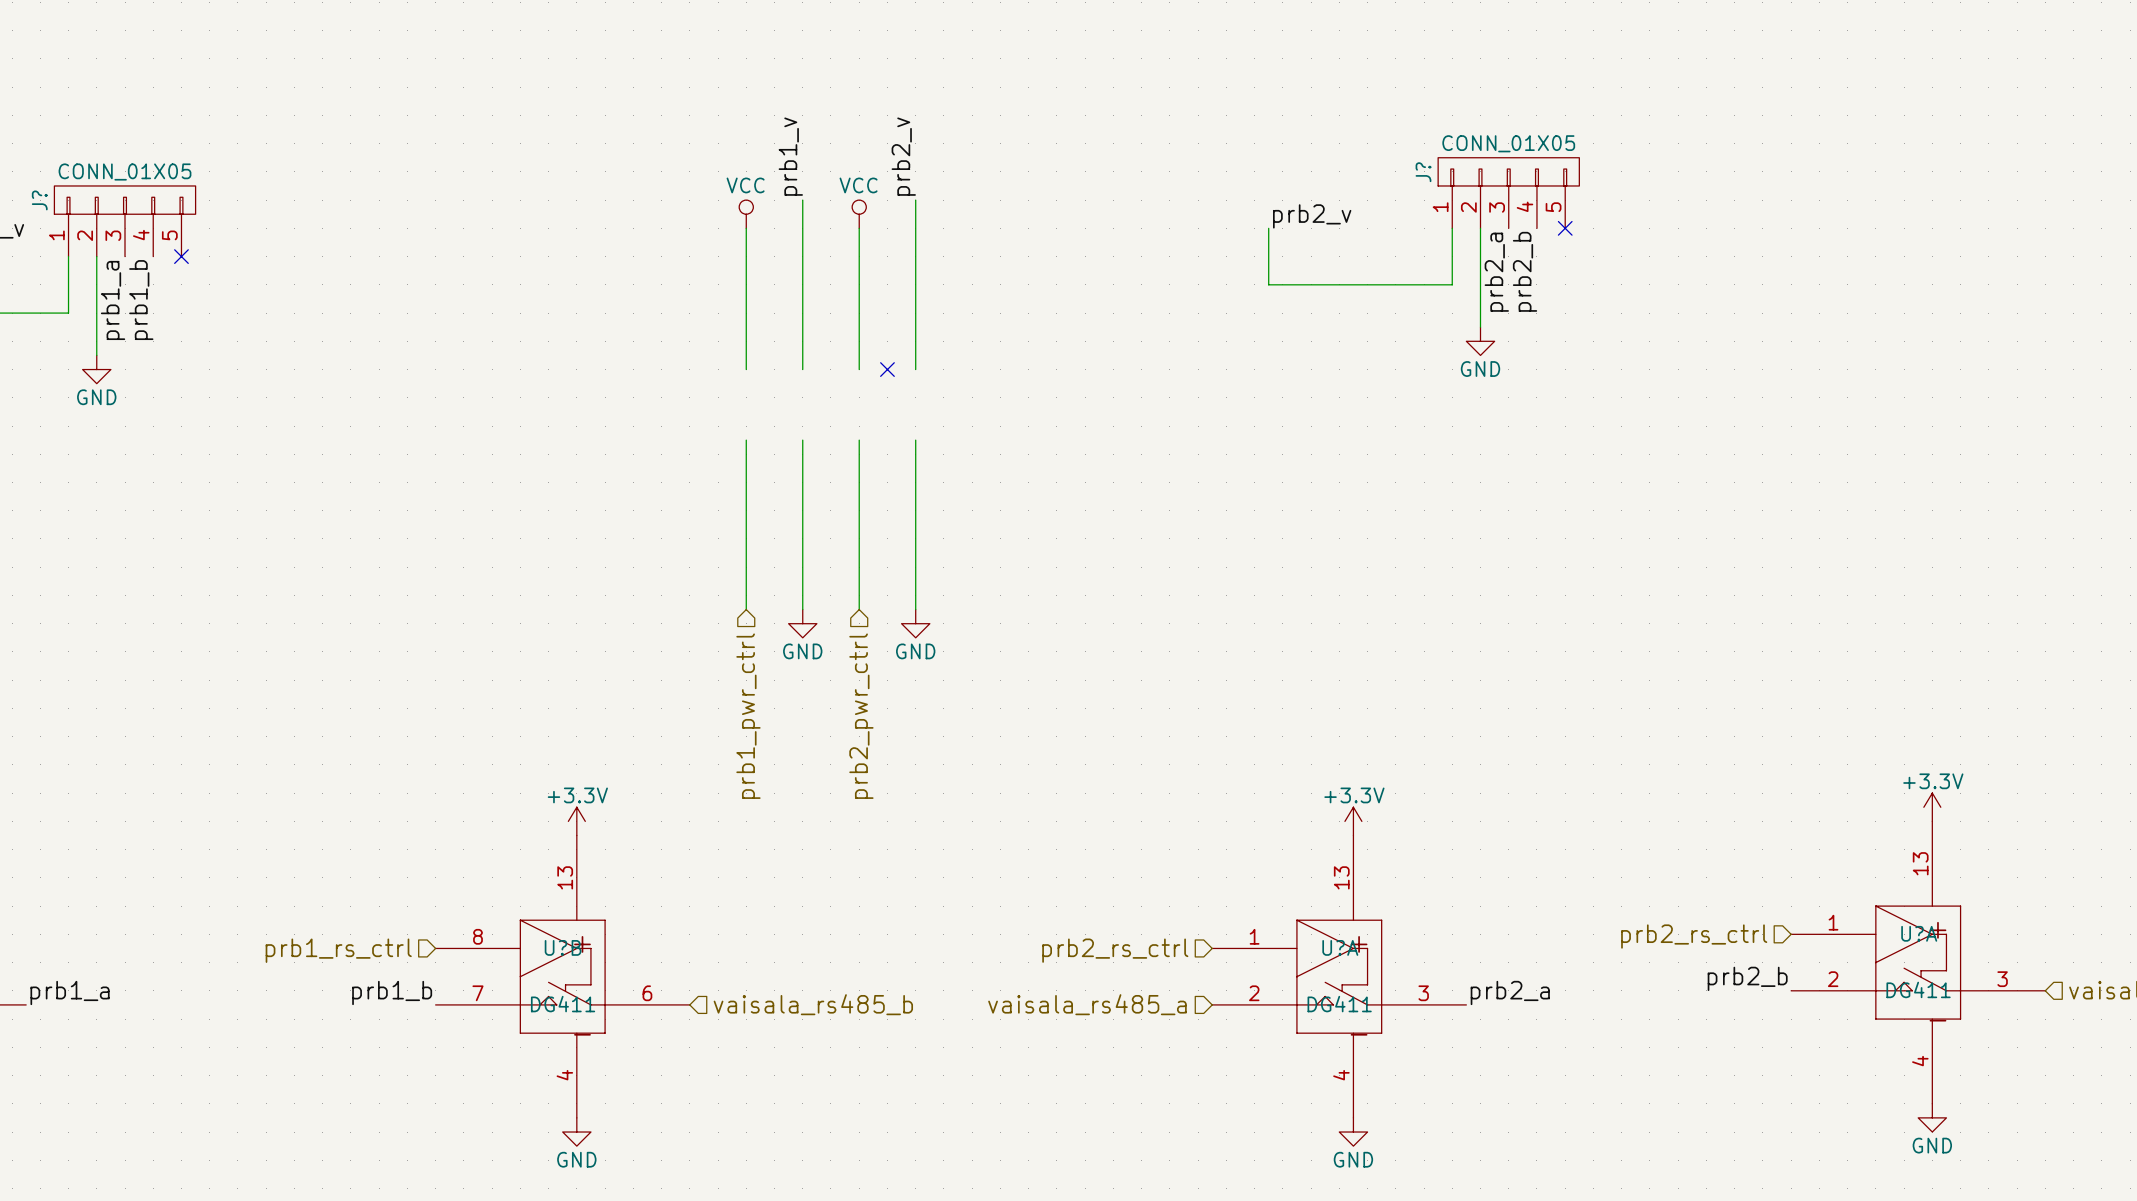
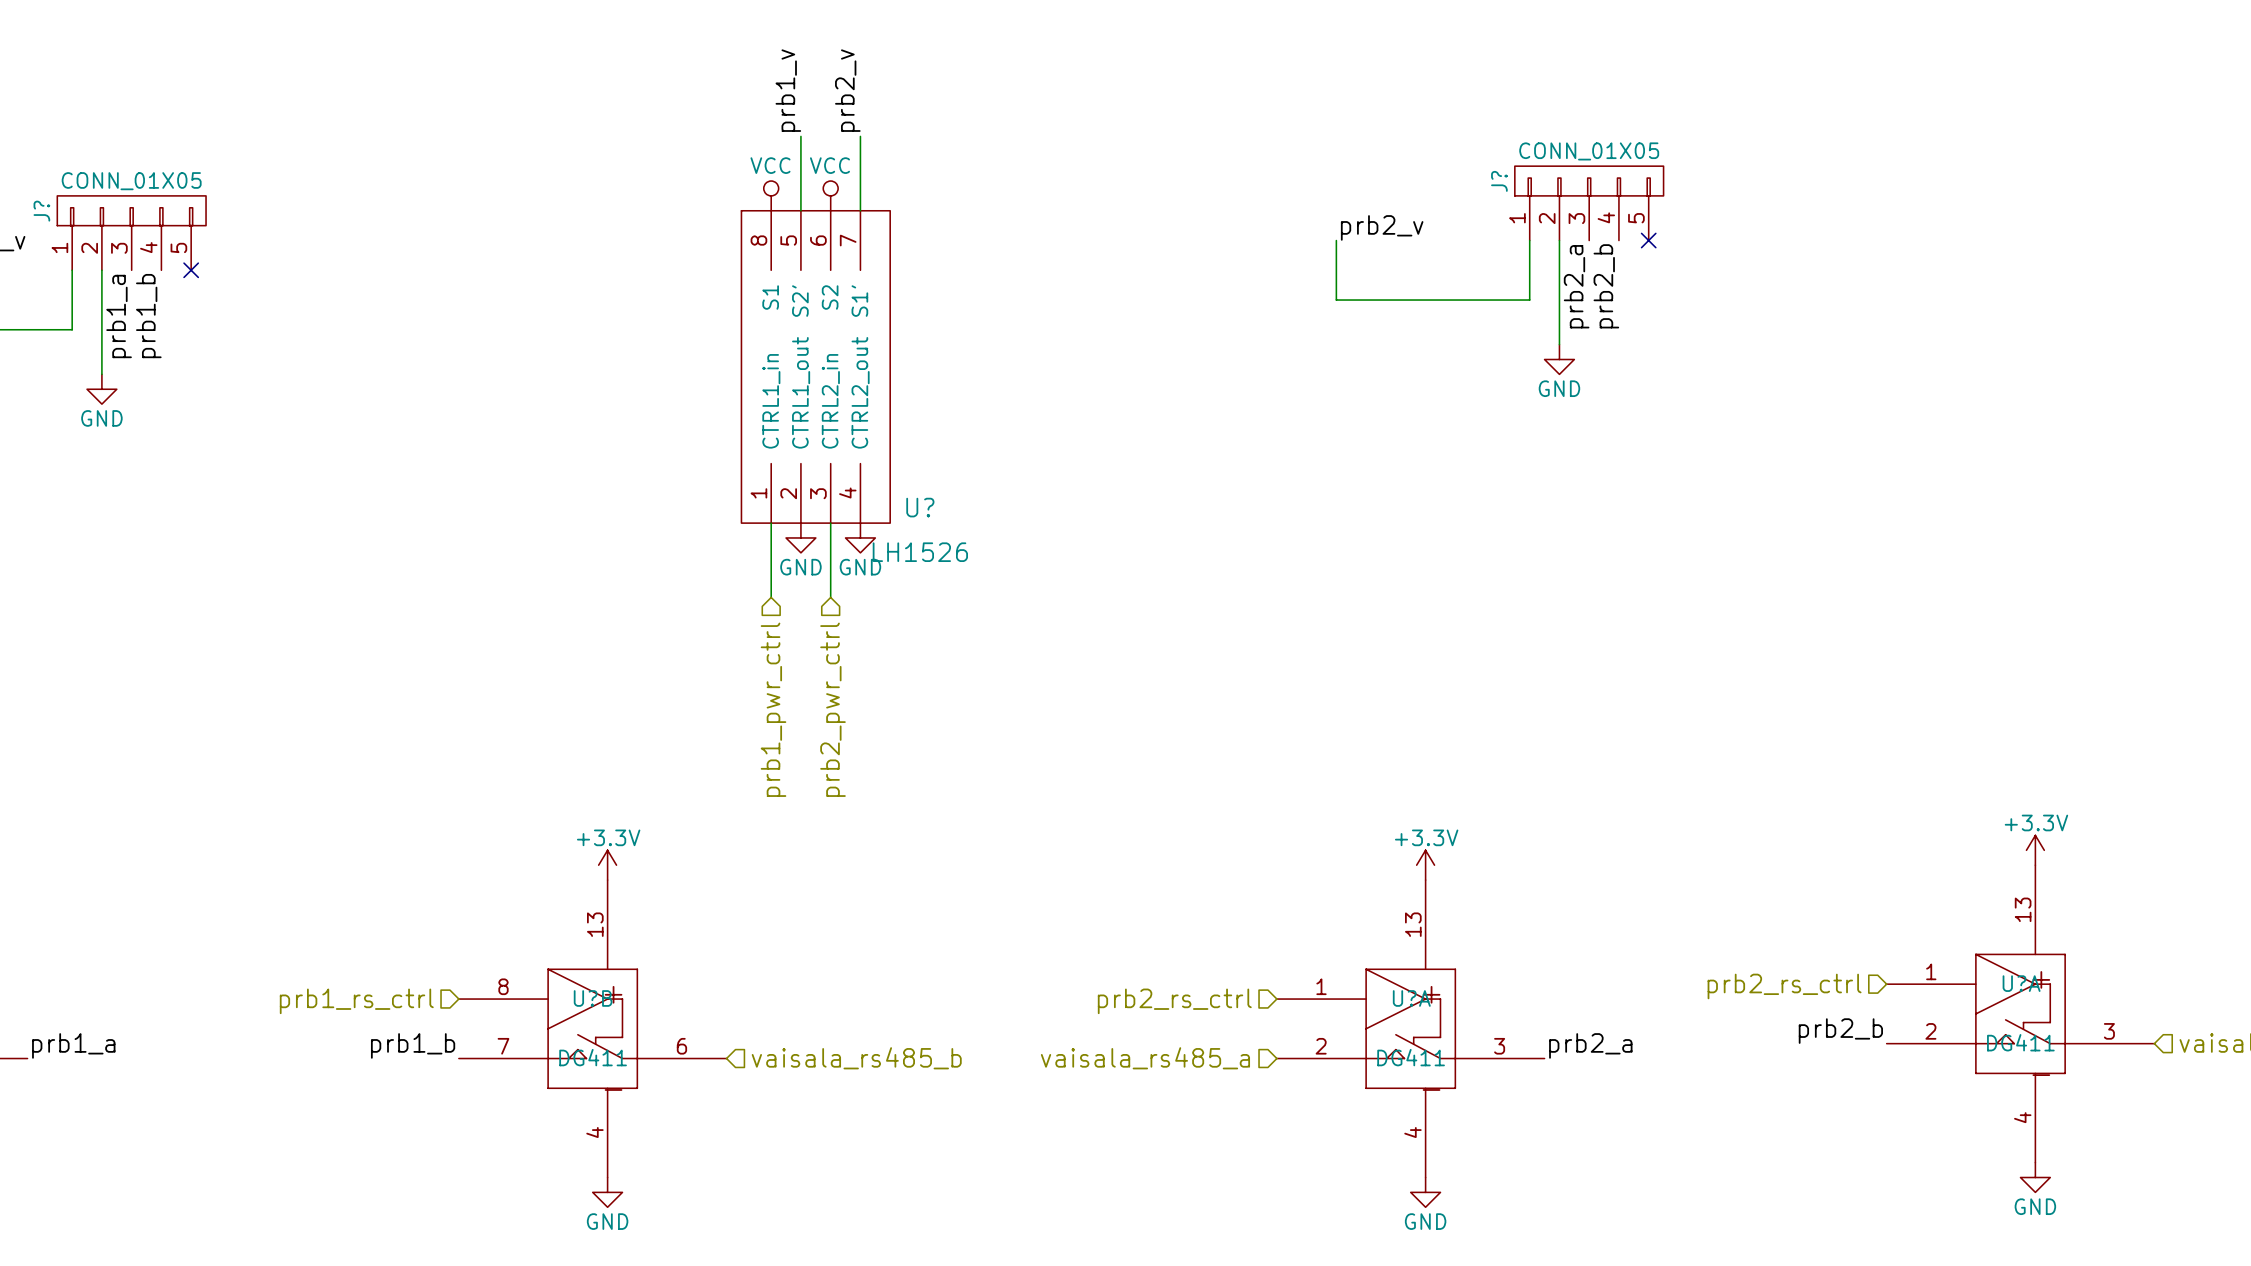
wire: none -> (800, 136) (800, 210)
wire: none -> (860, 136) (860, 210)
label position: prb1_v (790, 156) -> prb1_v (788, 90)
label position: prb2_v (903, 156) -> prb2_v (847, 90)
power symbol: none -> VCC (771, 195)
power symbol: none -> VCC (830, 195)
wire: (802, 200) (802, 369) -> none
wire: (915, 200) (915, 369) -> none
power symbol: VCC (746, 214) -> none
power symbol: VCC (859, 214) -> none
wire: (746, 228) (746, 369) -> none
wire: (859, 228) (859, 369) -> none
U?: none -> LH1526 (815, 366)
no-connect mark: (887, 369) -> none
wire: (746, 440) (746, 609) -> none
wire: (802, 440) (802, 609) -> none
wire: (859, 440) (859, 609) -> none
wire: (915, 440) (915, 609) -> none
wire: none -> (771, 523) (771, 597)
wire: none -> (830, 523) (830, 597)
power symbol: none -> GND (800, 537)
power symbol: none -> GND (860, 537)
power symbol: GND (802, 623) -> none
power symbol: GND (915, 623) -> none
hierarchical label position: prb1_pwr_ctrl (748, 716) -> prb1_pwr_ctrl (773, 709)
hierarchical label position: prb2_pwr_ctrl (861, 716) -> prb2_pwr_ctrl (832, 709)

